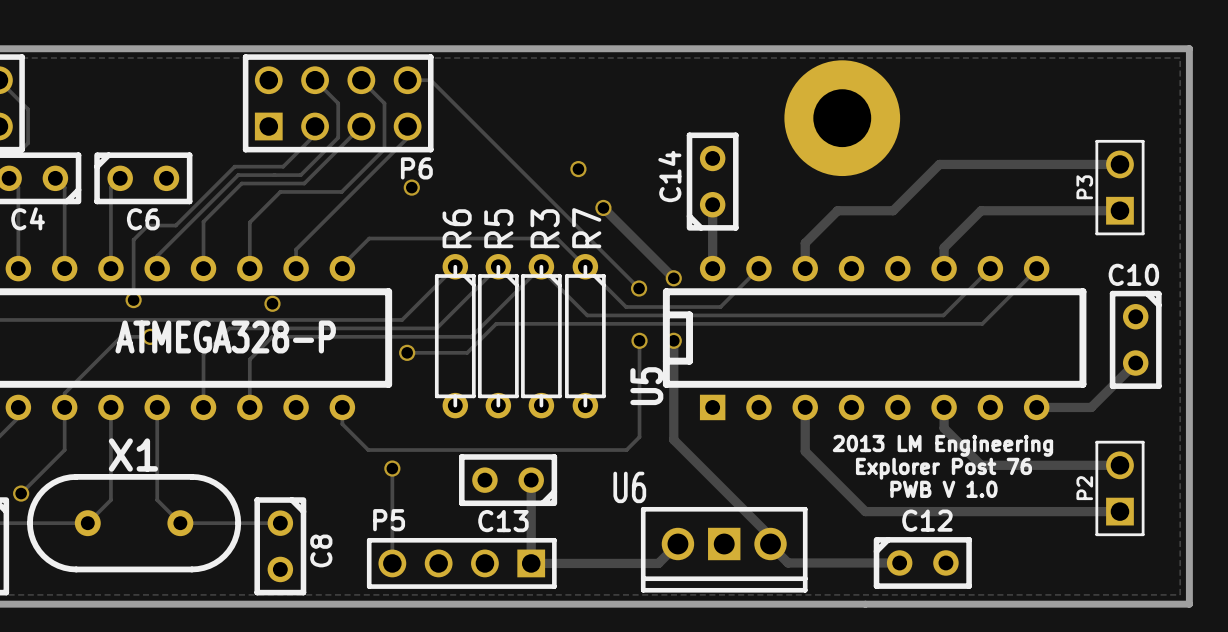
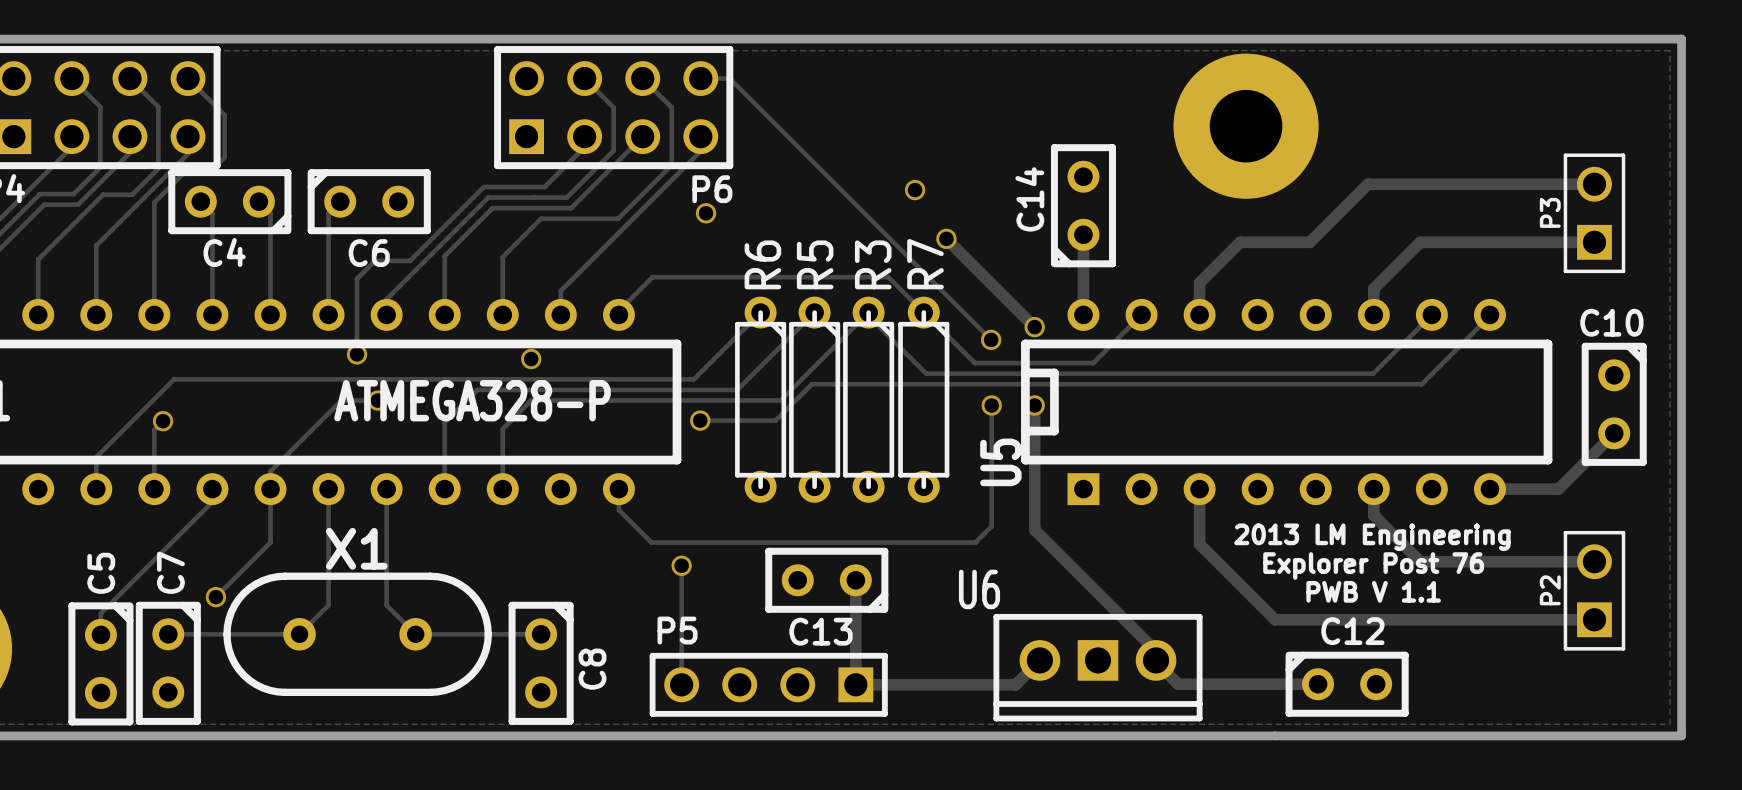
text: PWB V 1.0 (943, 489) -> PWB V 1.1 (1373, 591)

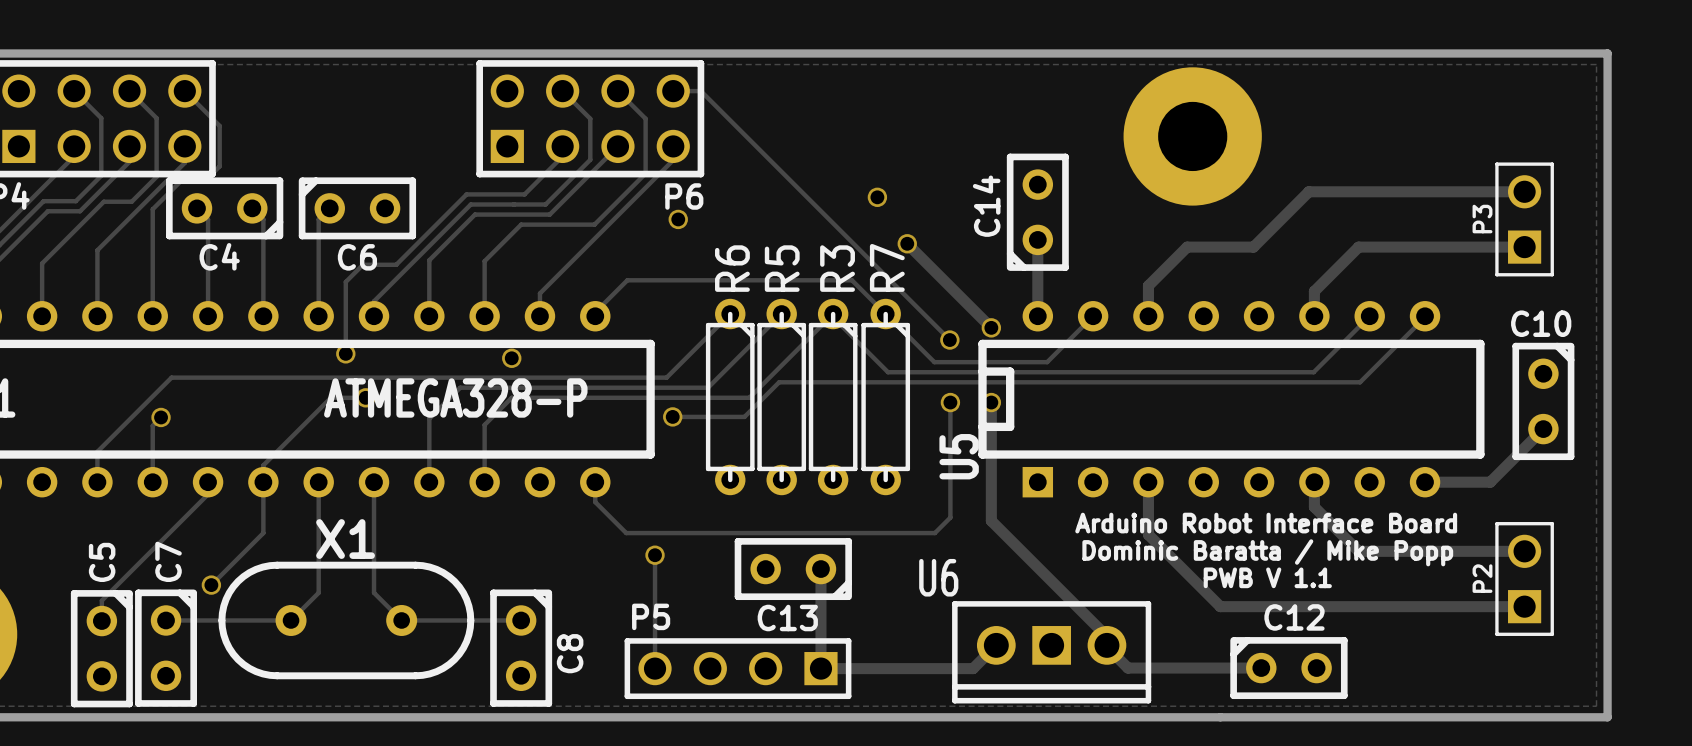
text: none -> Arduino Robot Interface Board (1266, 523)
text: 2013 LM Engineering (1372, 537) -> none
text: none -> Dominic Baratta / Mike Popp (1267, 552)
text: Explorer Post 76 (1373, 565) -> none
text position: PWB V 1.1 (1373, 591) -> PWB V 1.1 (1267, 577)

